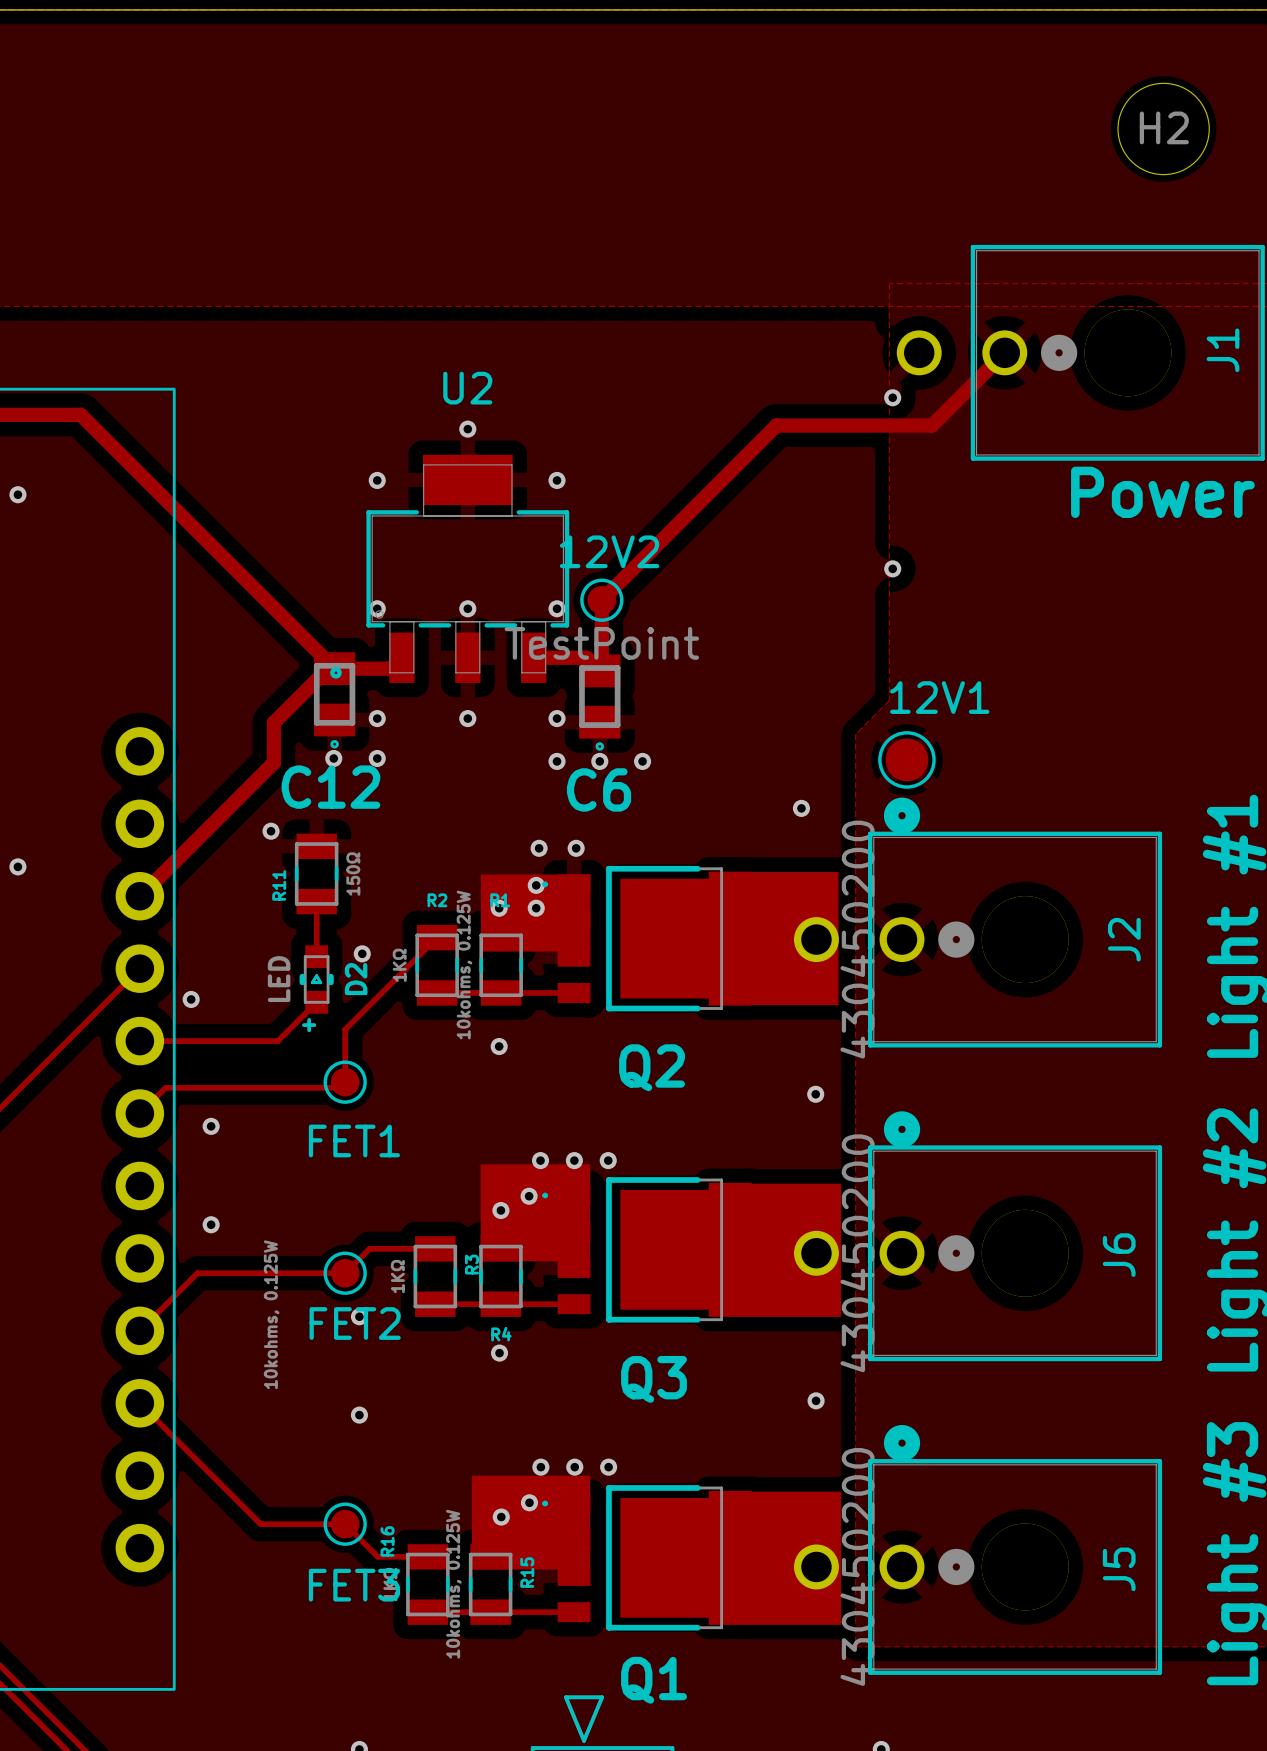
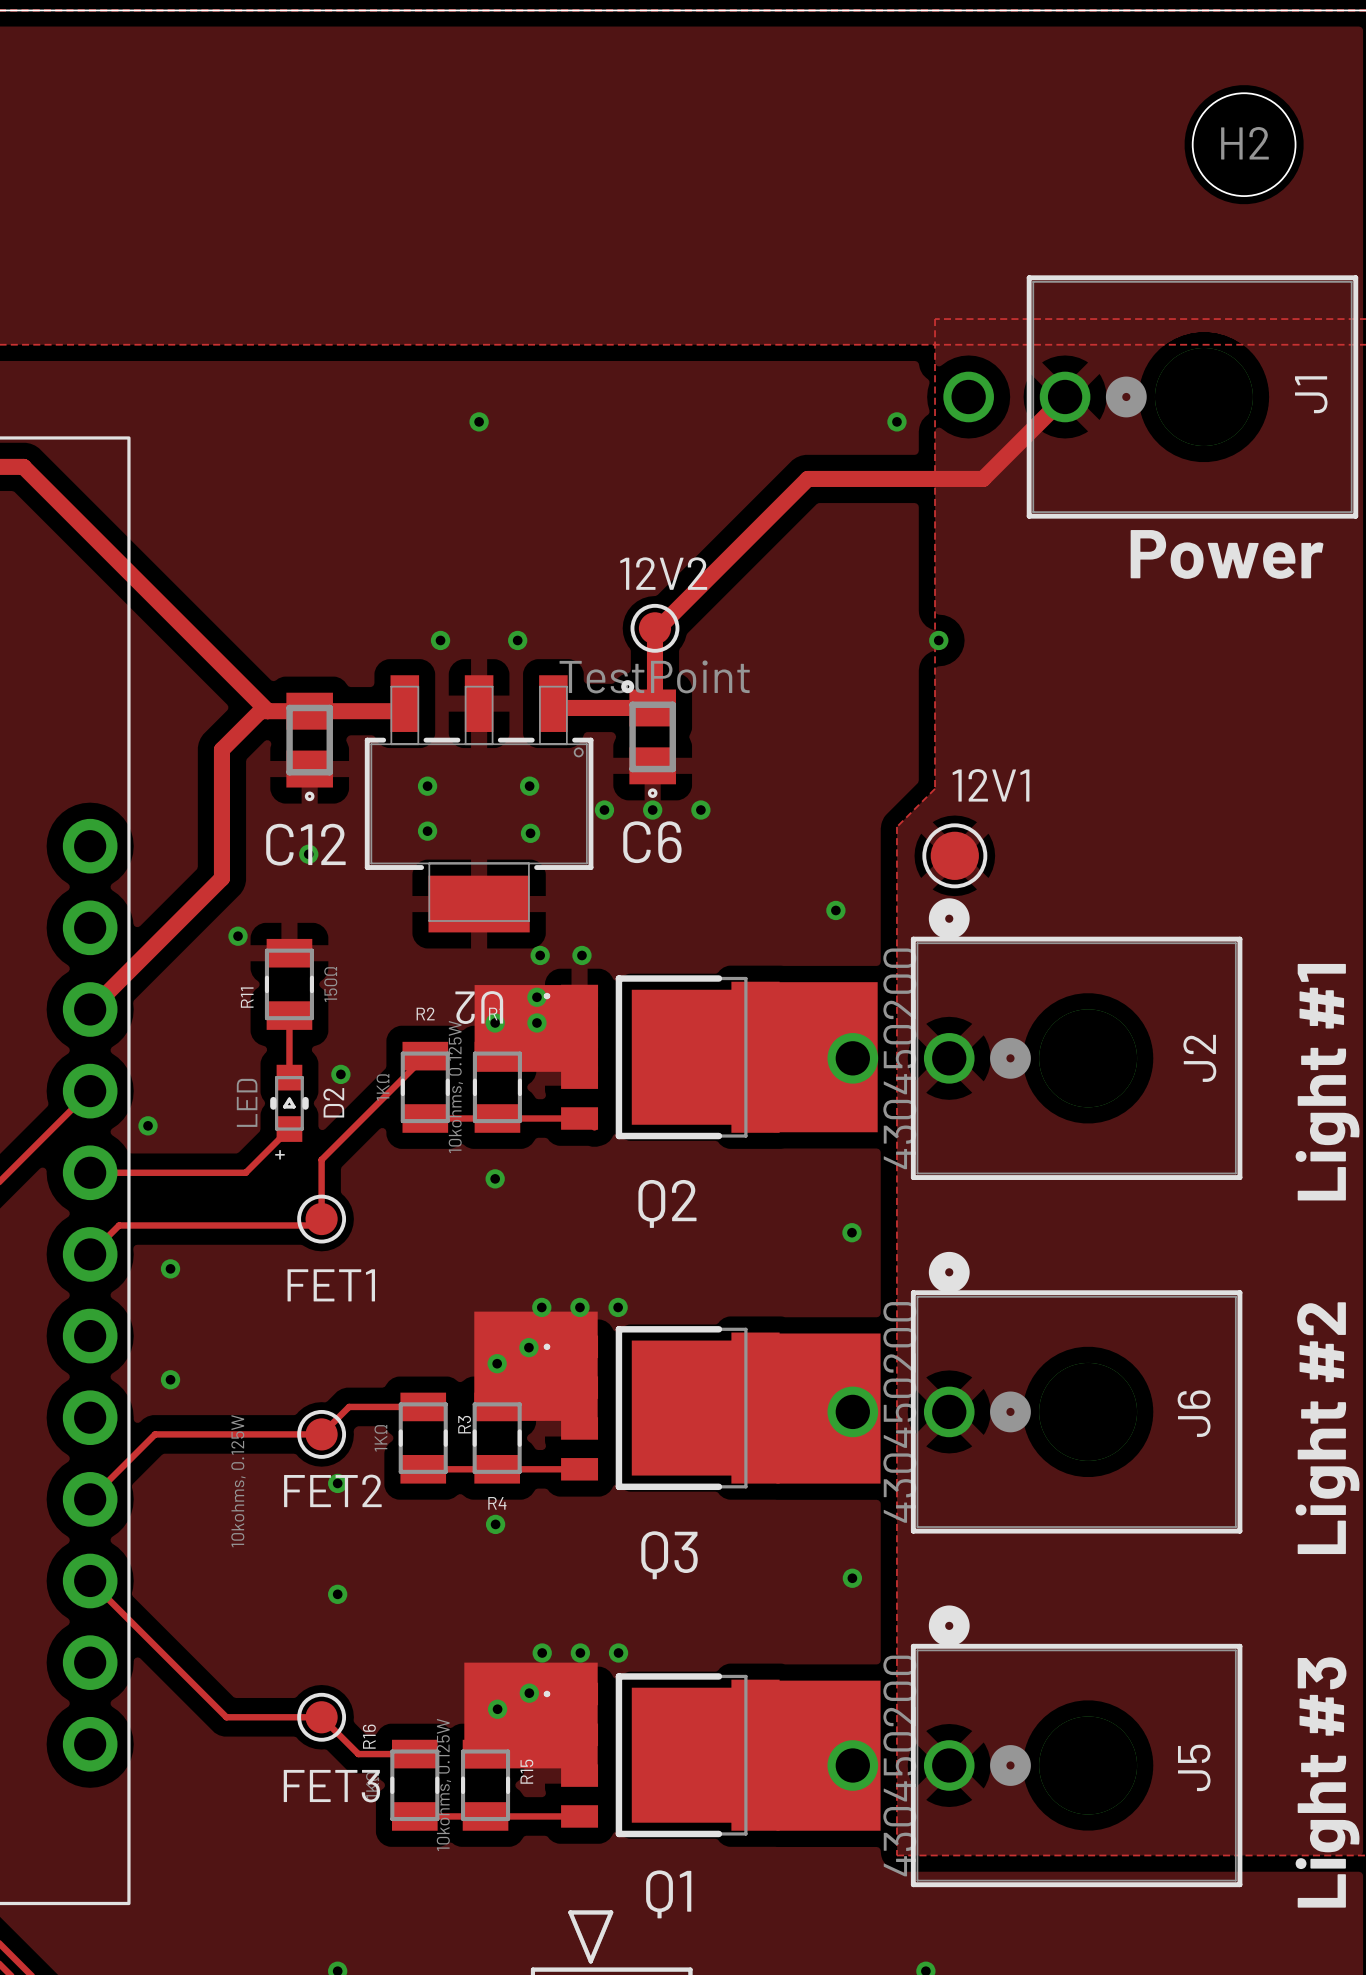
via position: (892, 397) -> (896, 421)
via position: (467, 429) -> (479, 421)
via: (377, 480) -> none
via: (557, 480) -> none
track: (643, 558) (601, 600) (601, 668) (599, 670) (586, 657) (533, 657) -> (658, 628) (654, 628) (654, 705) (652, 707) (557, 707) (553, 703)
U2 rotation: 0° (449, 568) -> 180° (499, 803)
U2 position: (449, 568) -> (499, 803)
via: none -> (440, 640)
via: none -> (517, 640)
12V2 position: (601, 600) -> (654, 628)
via: (377, 608) -> none
via: (467, 608) -> none
via: (557, 608) -> none
track: (297, 631) (334, 668) -> none
track: (401, 657) (390, 668) (328, 668) (273, 722) (273, 762) (256, 779) -> (404, 703) (397, 711) (260, 711) (221, 749) (221, 878)
via: none -> (427, 786)
via: none -> (529, 786)
C12 position: (334, 700) -> (309, 746)
C6 position: (599, 702) -> (652, 743)
via: (377, 718) -> none
via: (467, 718) -> none
via: (557, 718) -> none
via: none -> (604, 810)
via: none -> (652, 810)
via: none -> (700, 810)
via: none -> (427, 831)
via: none -> (530, 833)
via: (377, 758) -> none
via: (557, 761) -> none
via: (599, 761) -> none
via: (642, 761) -> none

